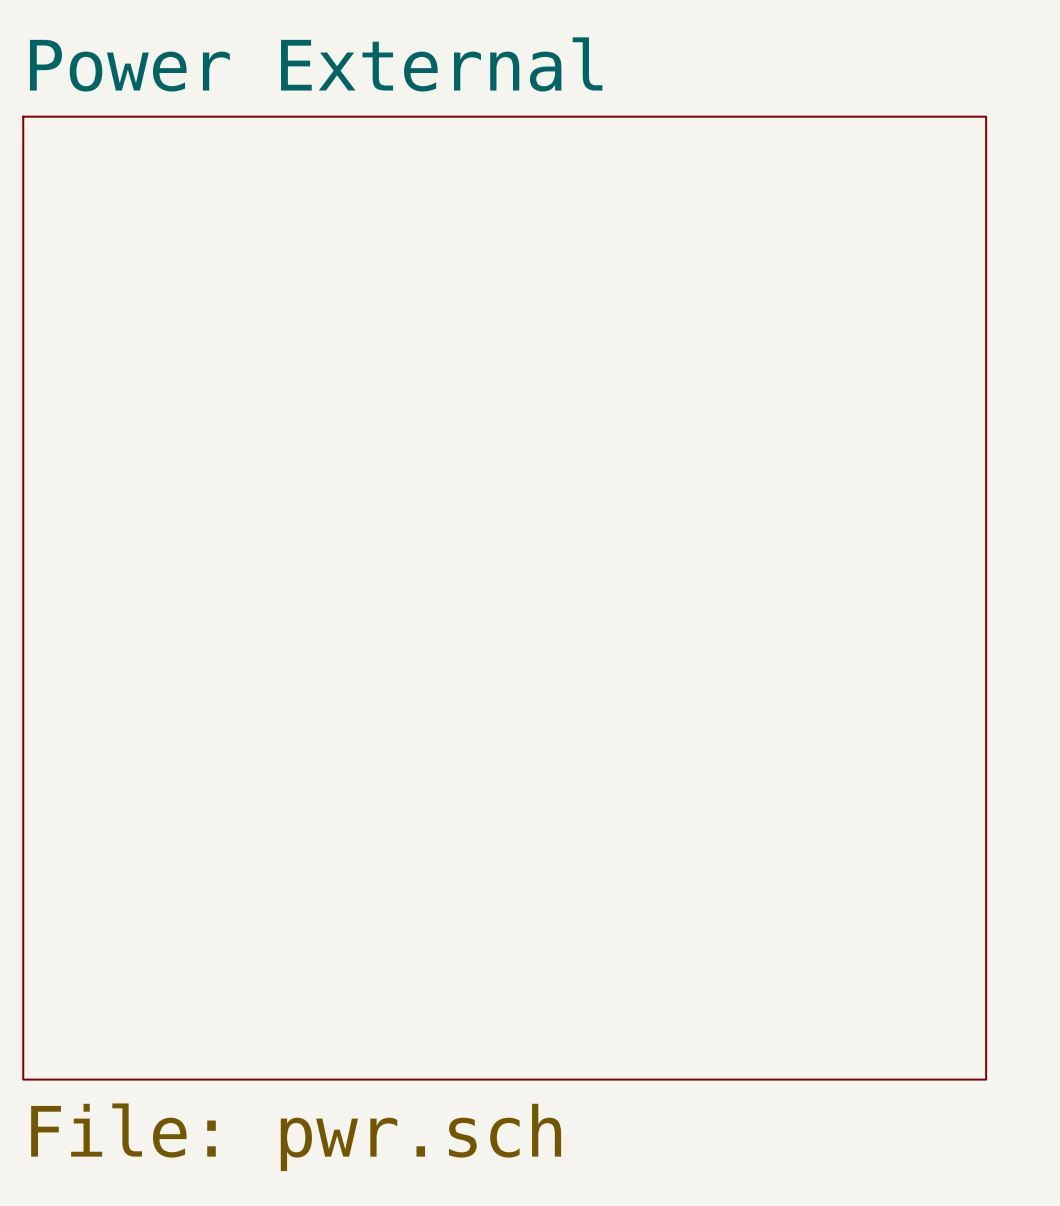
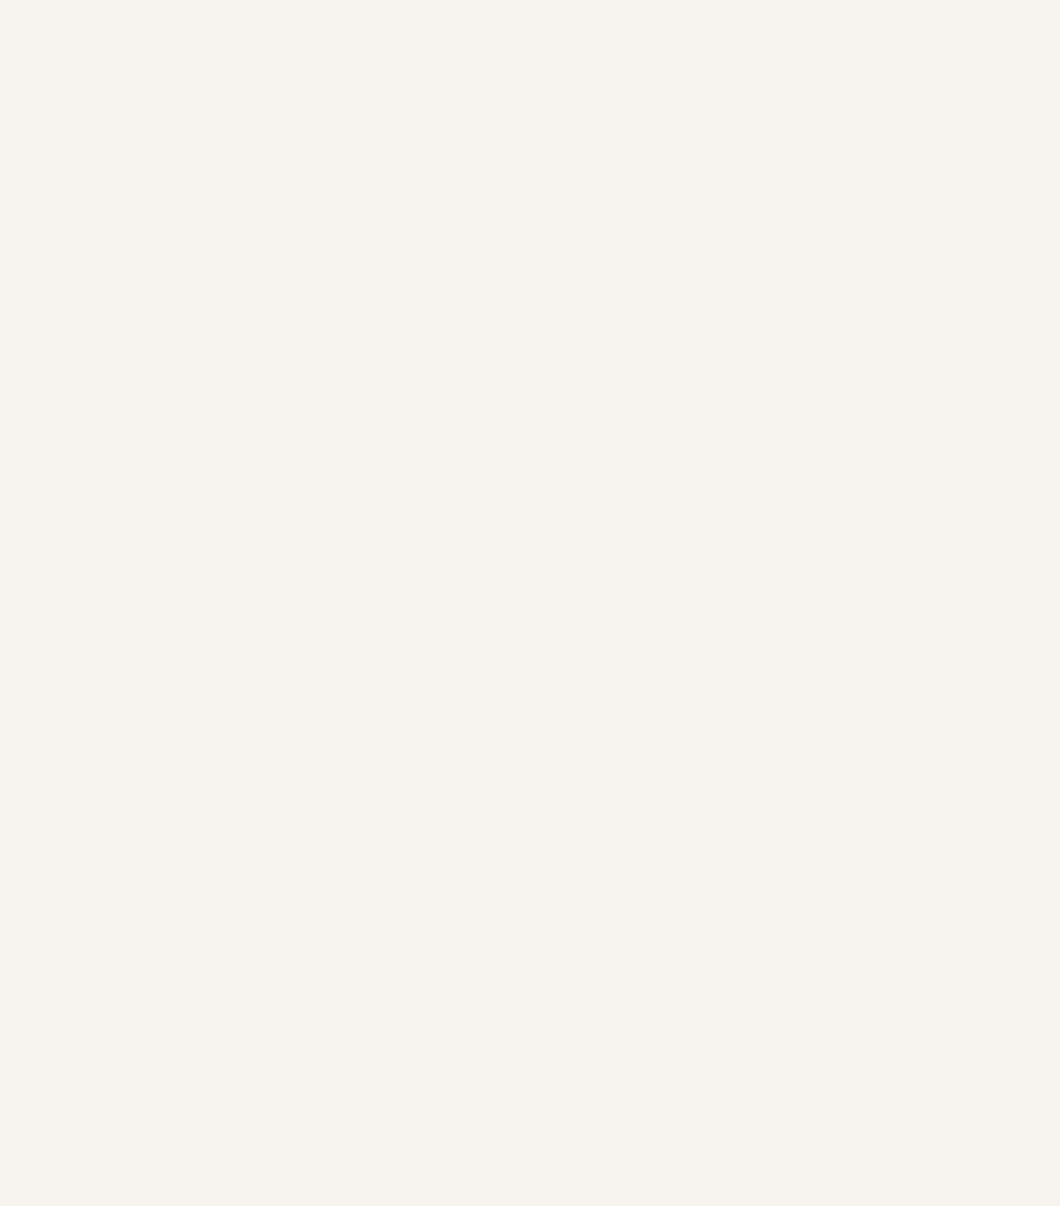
sheet Power External: File: pwr.sch (504, 598) -> none

